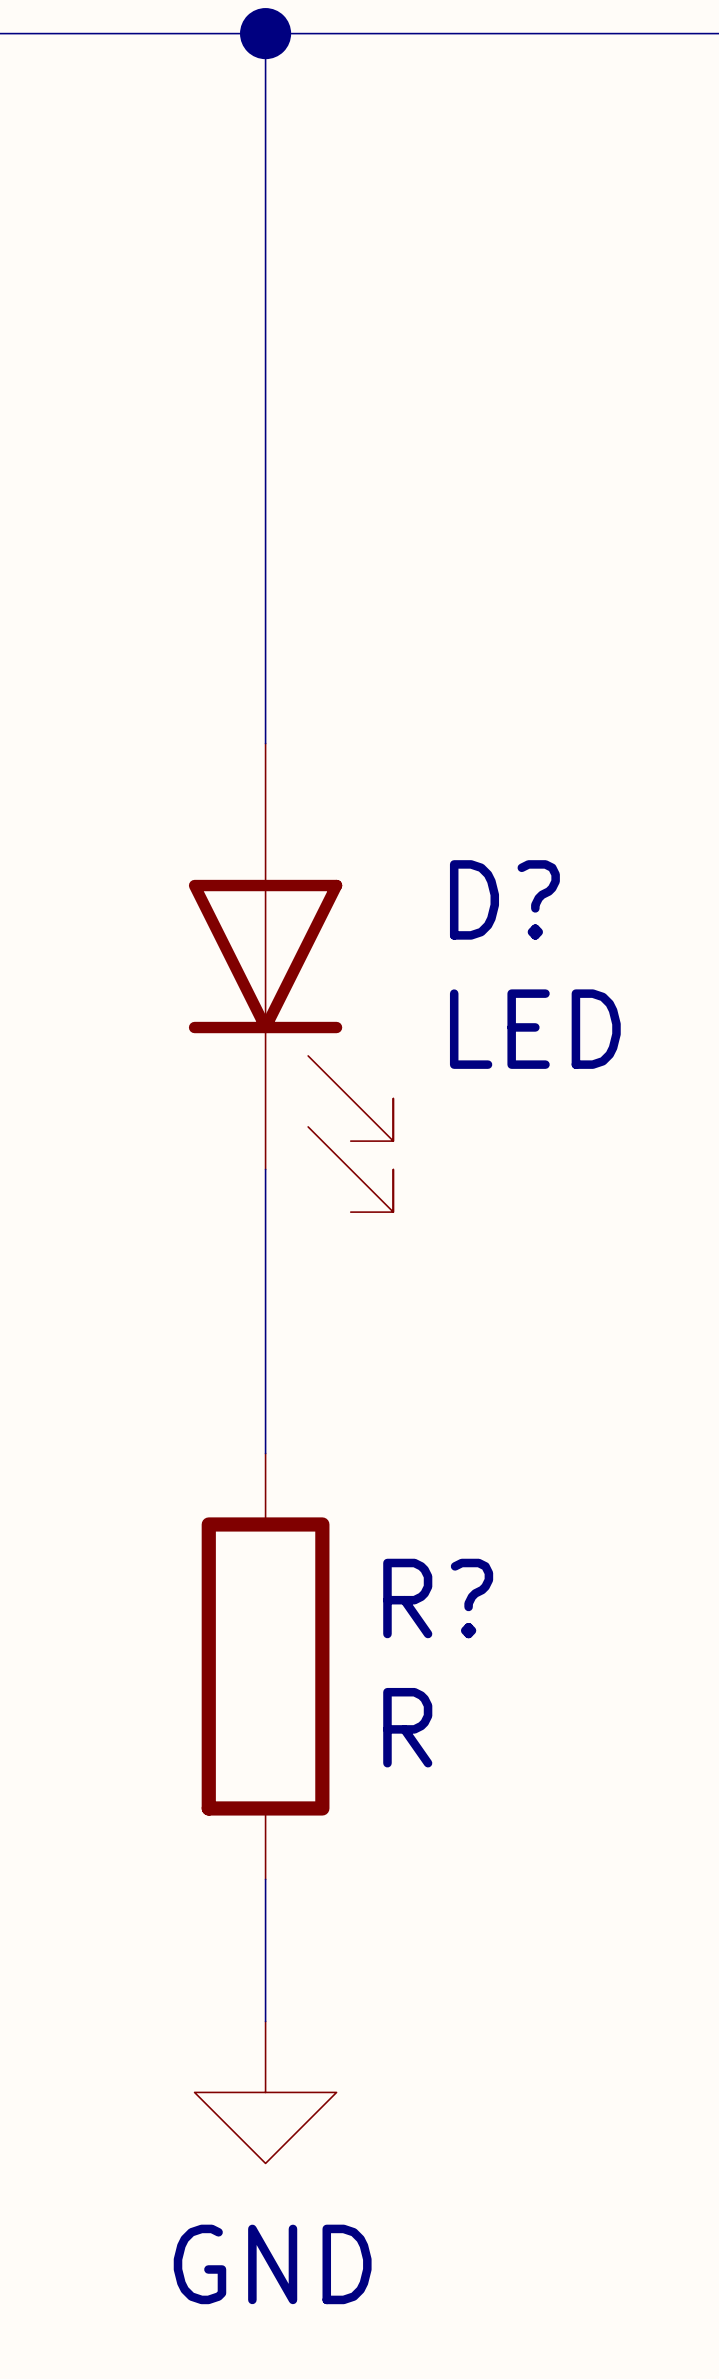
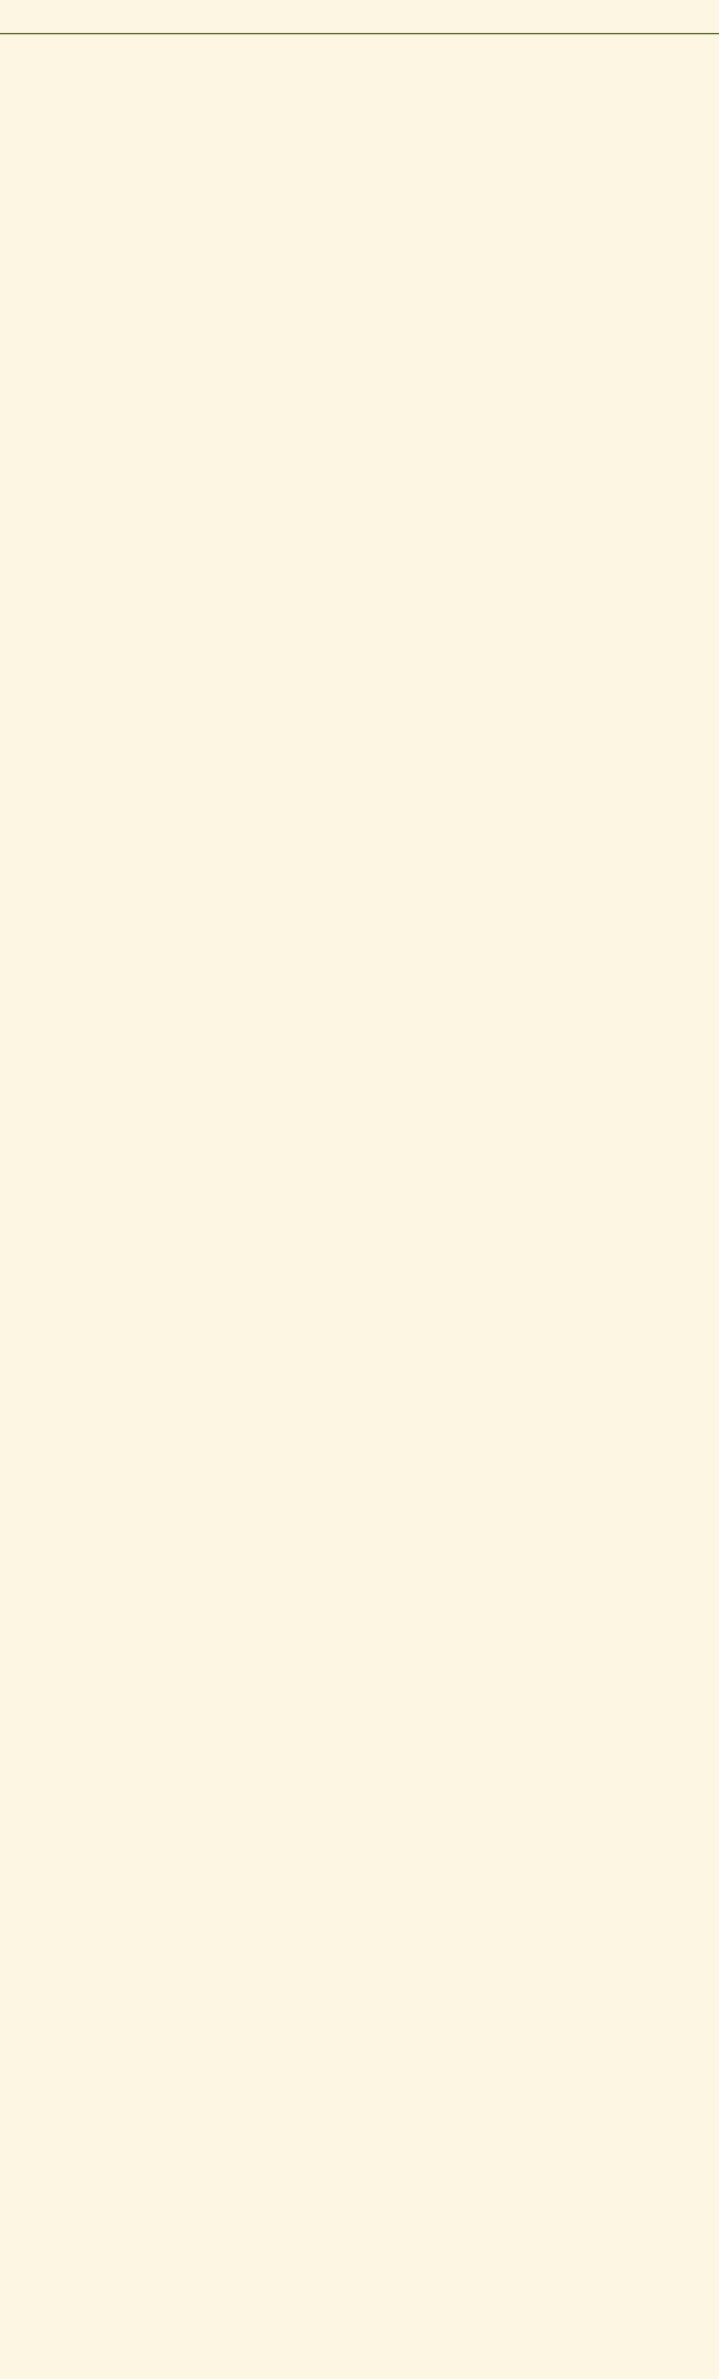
wire: (265, 33) (265, 743) -> none
junction: (265, 33) -> none
D?: LED (291, 977) -> none
wire: (265, 1169) (265, 1453) -> none
R?: R (265, 1666) -> none
wire: (265, 1879) (265, 2021) -> none
power symbol: GND (265, 2092) -> none

